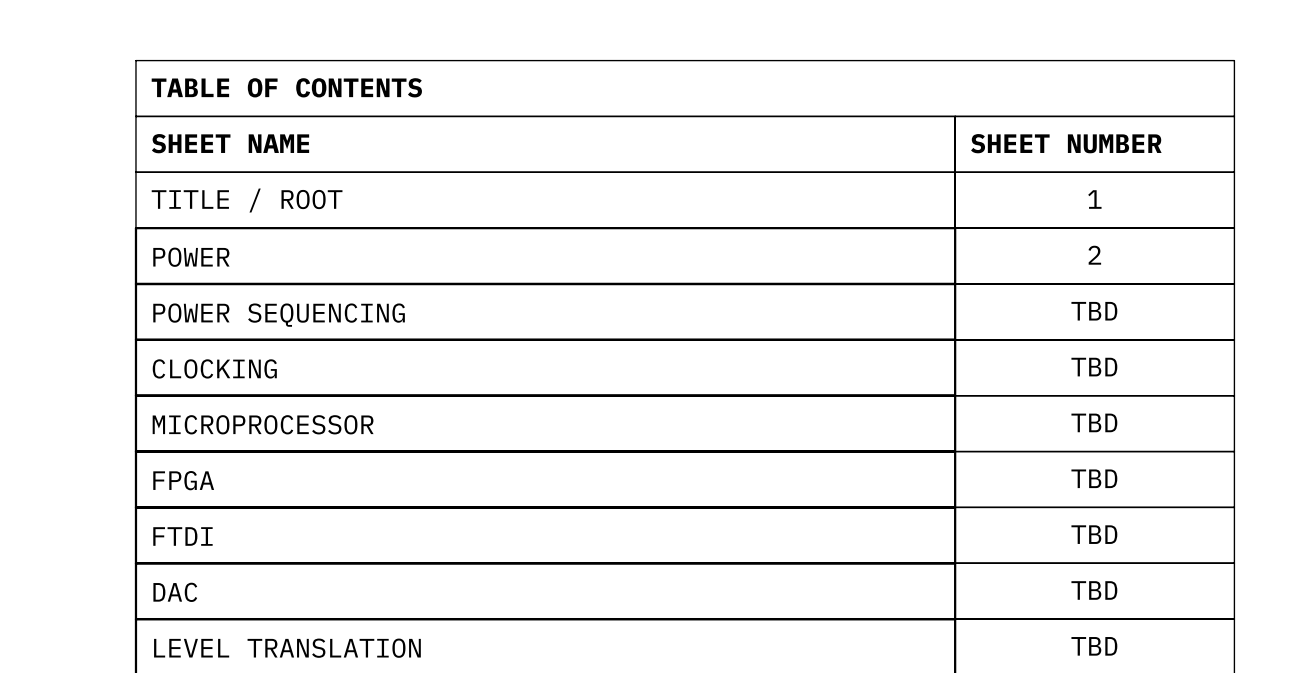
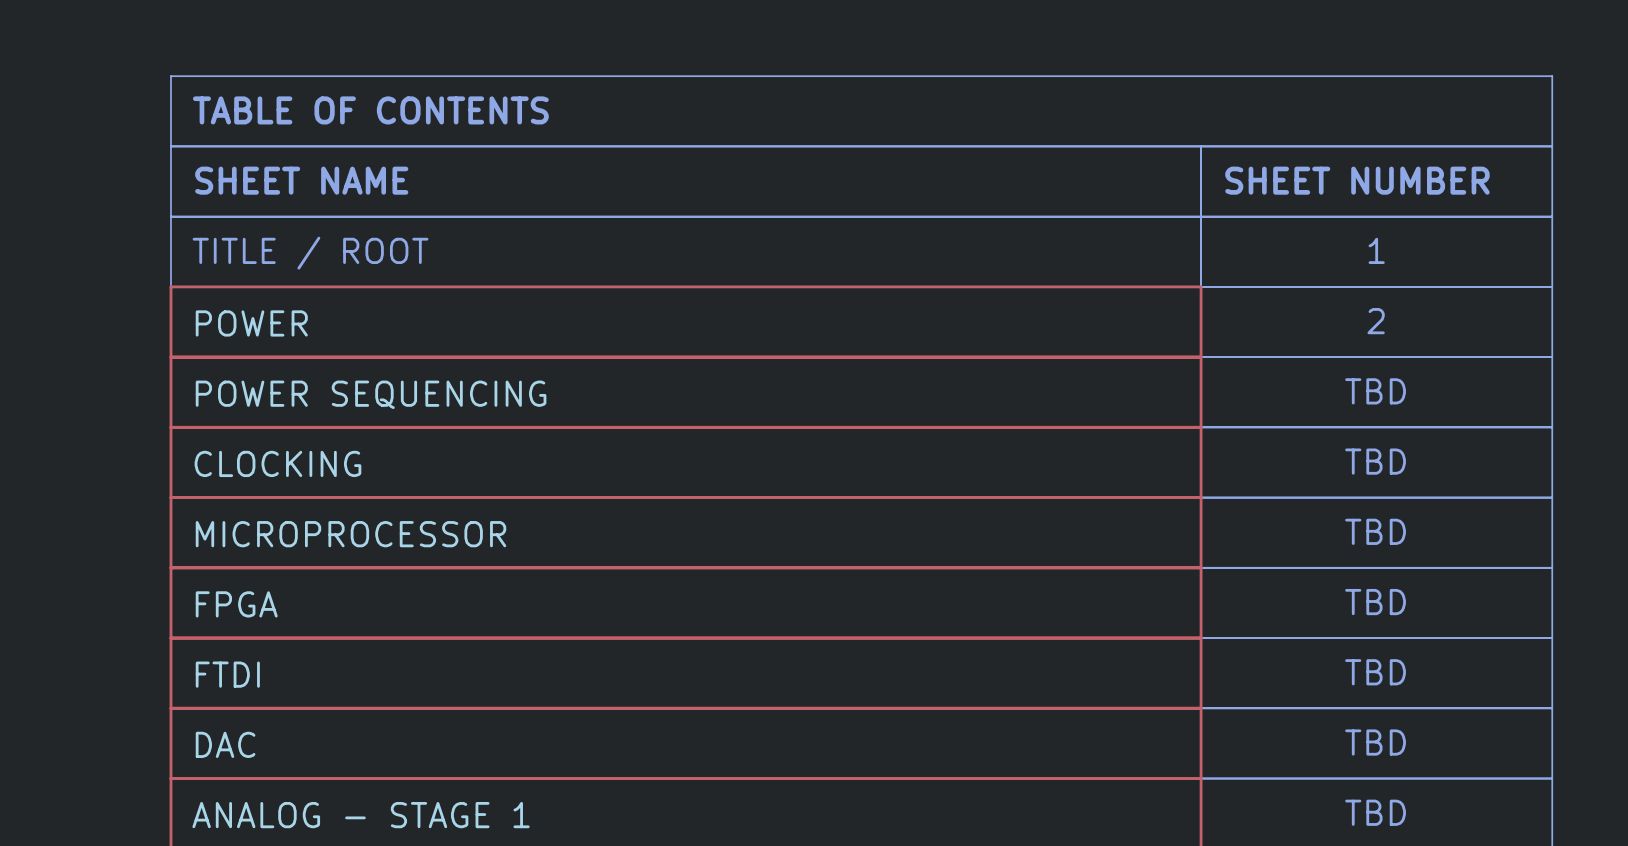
sheet LEVEL TRANSLATION name: LEVEL TRANSLATION (287, 648) -> ANALOG - STAGE 1 (361, 815)

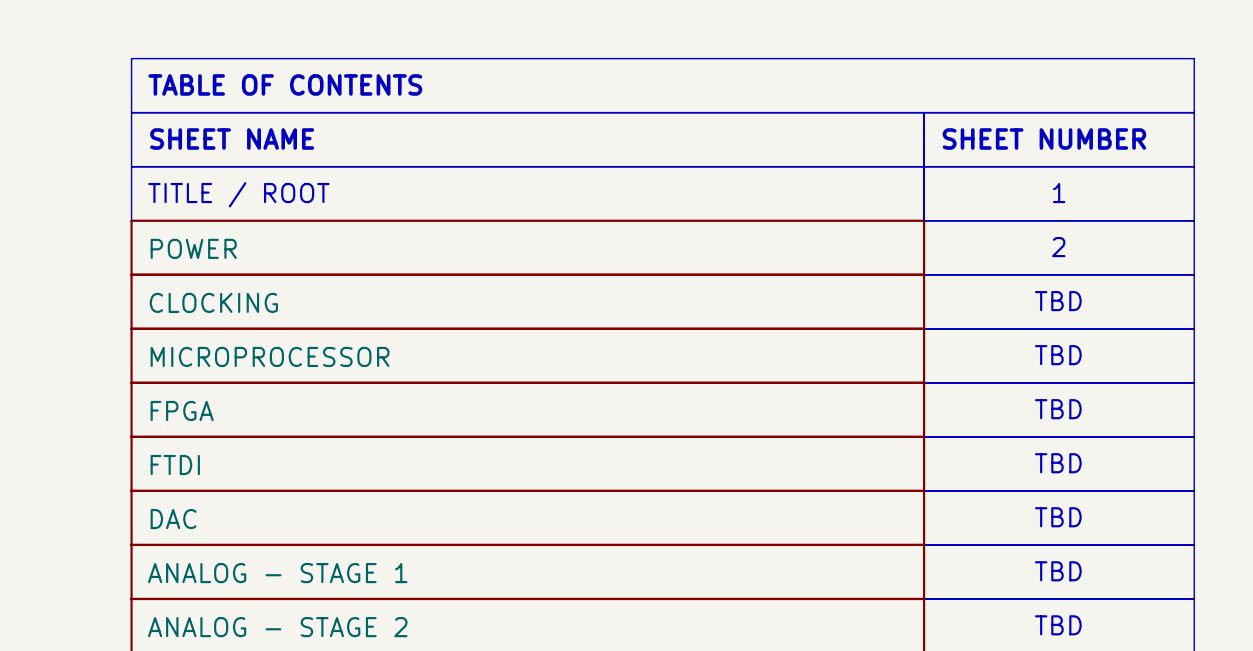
sheet POWER SEQUENCING name: POWER SEQUENCING (371, 394) -> CLOCKING (213, 302)
sheet CLOCKING name: CLOCKING (277, 463) -> MICROPROCESSOR (270, 356)
sheet MICROPROCESSOR name: MICROPROCESSOR (350, 534) -> FPGA (182, 410)
sheet FPGA name: FPGA (236, 604) -> FTDI (175, 465)
sheet FTDI name: FTDI (227, 674) -> DAC (173, 519)
sheet DAC name: DAC (225, 744) -> ANALOG - STAGE 1 (277, 573)
sheet ANALOG - STAGE 1 name: ANALOG - STAGE 1 (361, 815) -> ANALOG - STAGE 2 (277, 627)

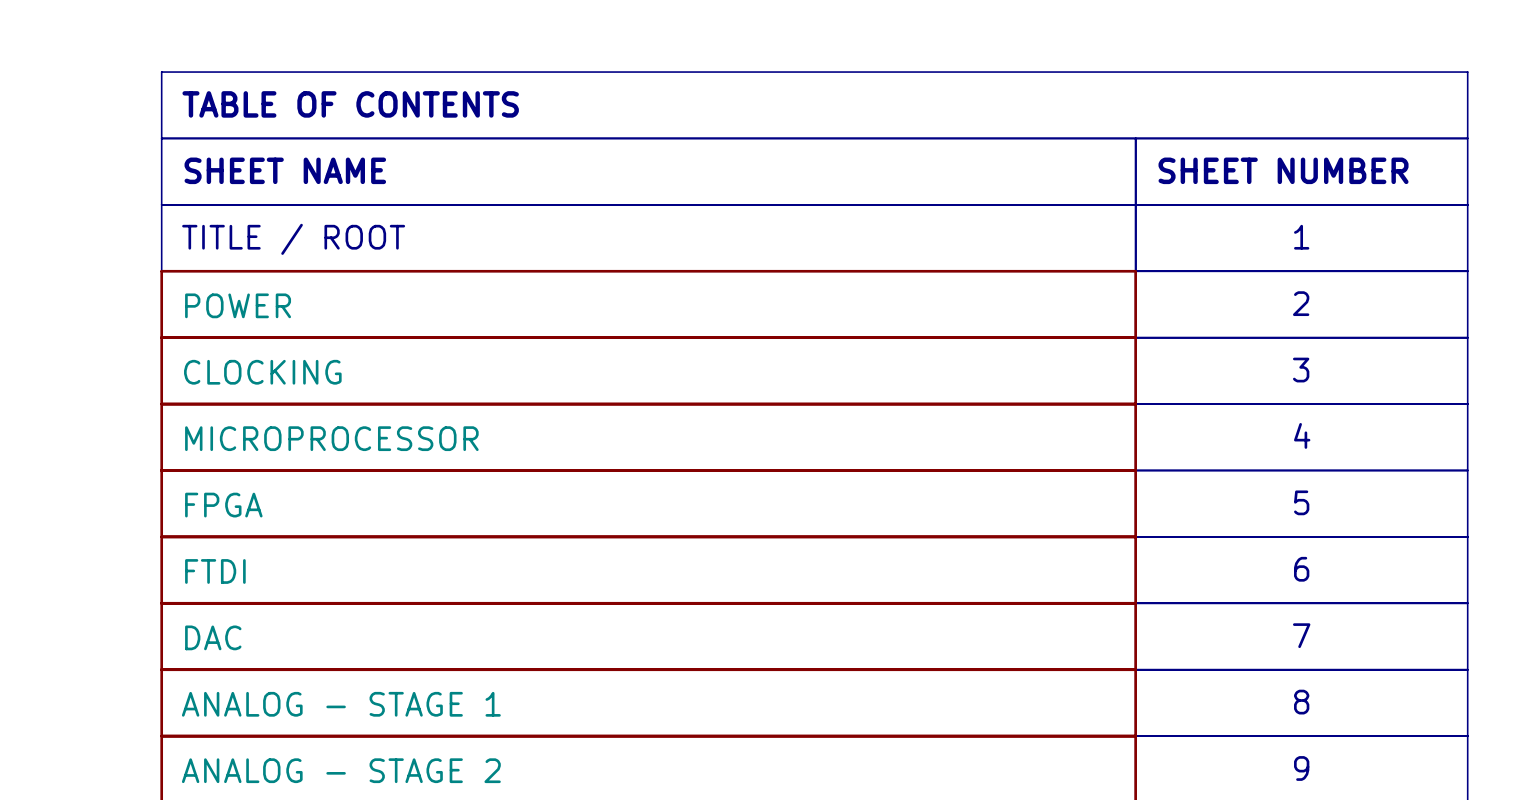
text: TBD (1058, 301) -> 3 (1301, 370)
text: TBD (1058, 355) -> 4 (1302, 435)
text: TBD (1058, 409) -> 5 (1301, 502)
text: TBD (1058, 463) -> 6 (1301, 569)
text: TBD (1058, 517) -> 7 (1301, 635)
text: TBD (1058, 571) -> 8 (1301, 702)
text: TBD (1058, 625) -> 9 (1301, 768)

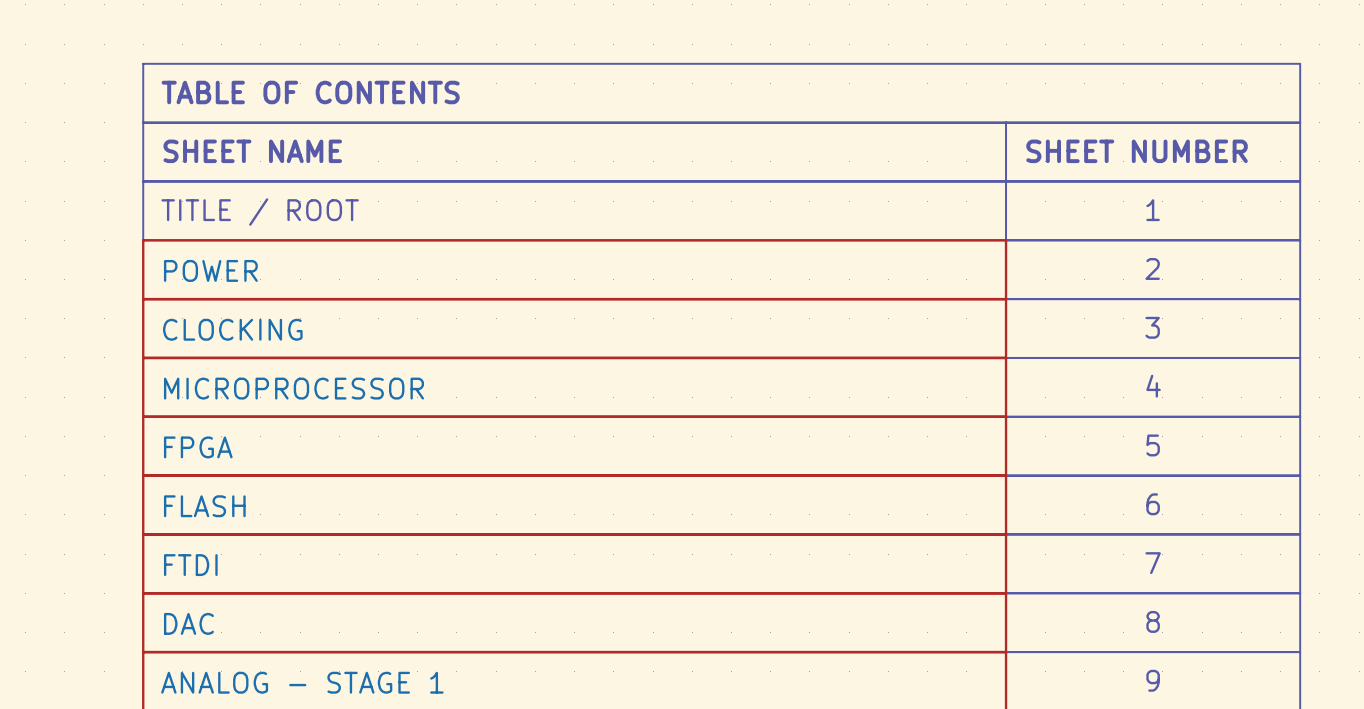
sheet FTDI name: FTDI (215, 571) -> FLASH (204, 506)
sheet DAC name: DAC (213, 637) -> FTDI (190, 565)
sheet ANALOG - STAGE 1 name: ANALOG - STAGE 1 (341, 704) -> DAC (188, 623)
sheet ANALOG - STAGE 2 name: ANALOG - STAGE 2 (341, 770) -> ANALOG - STAGE 1 (302, 682)

